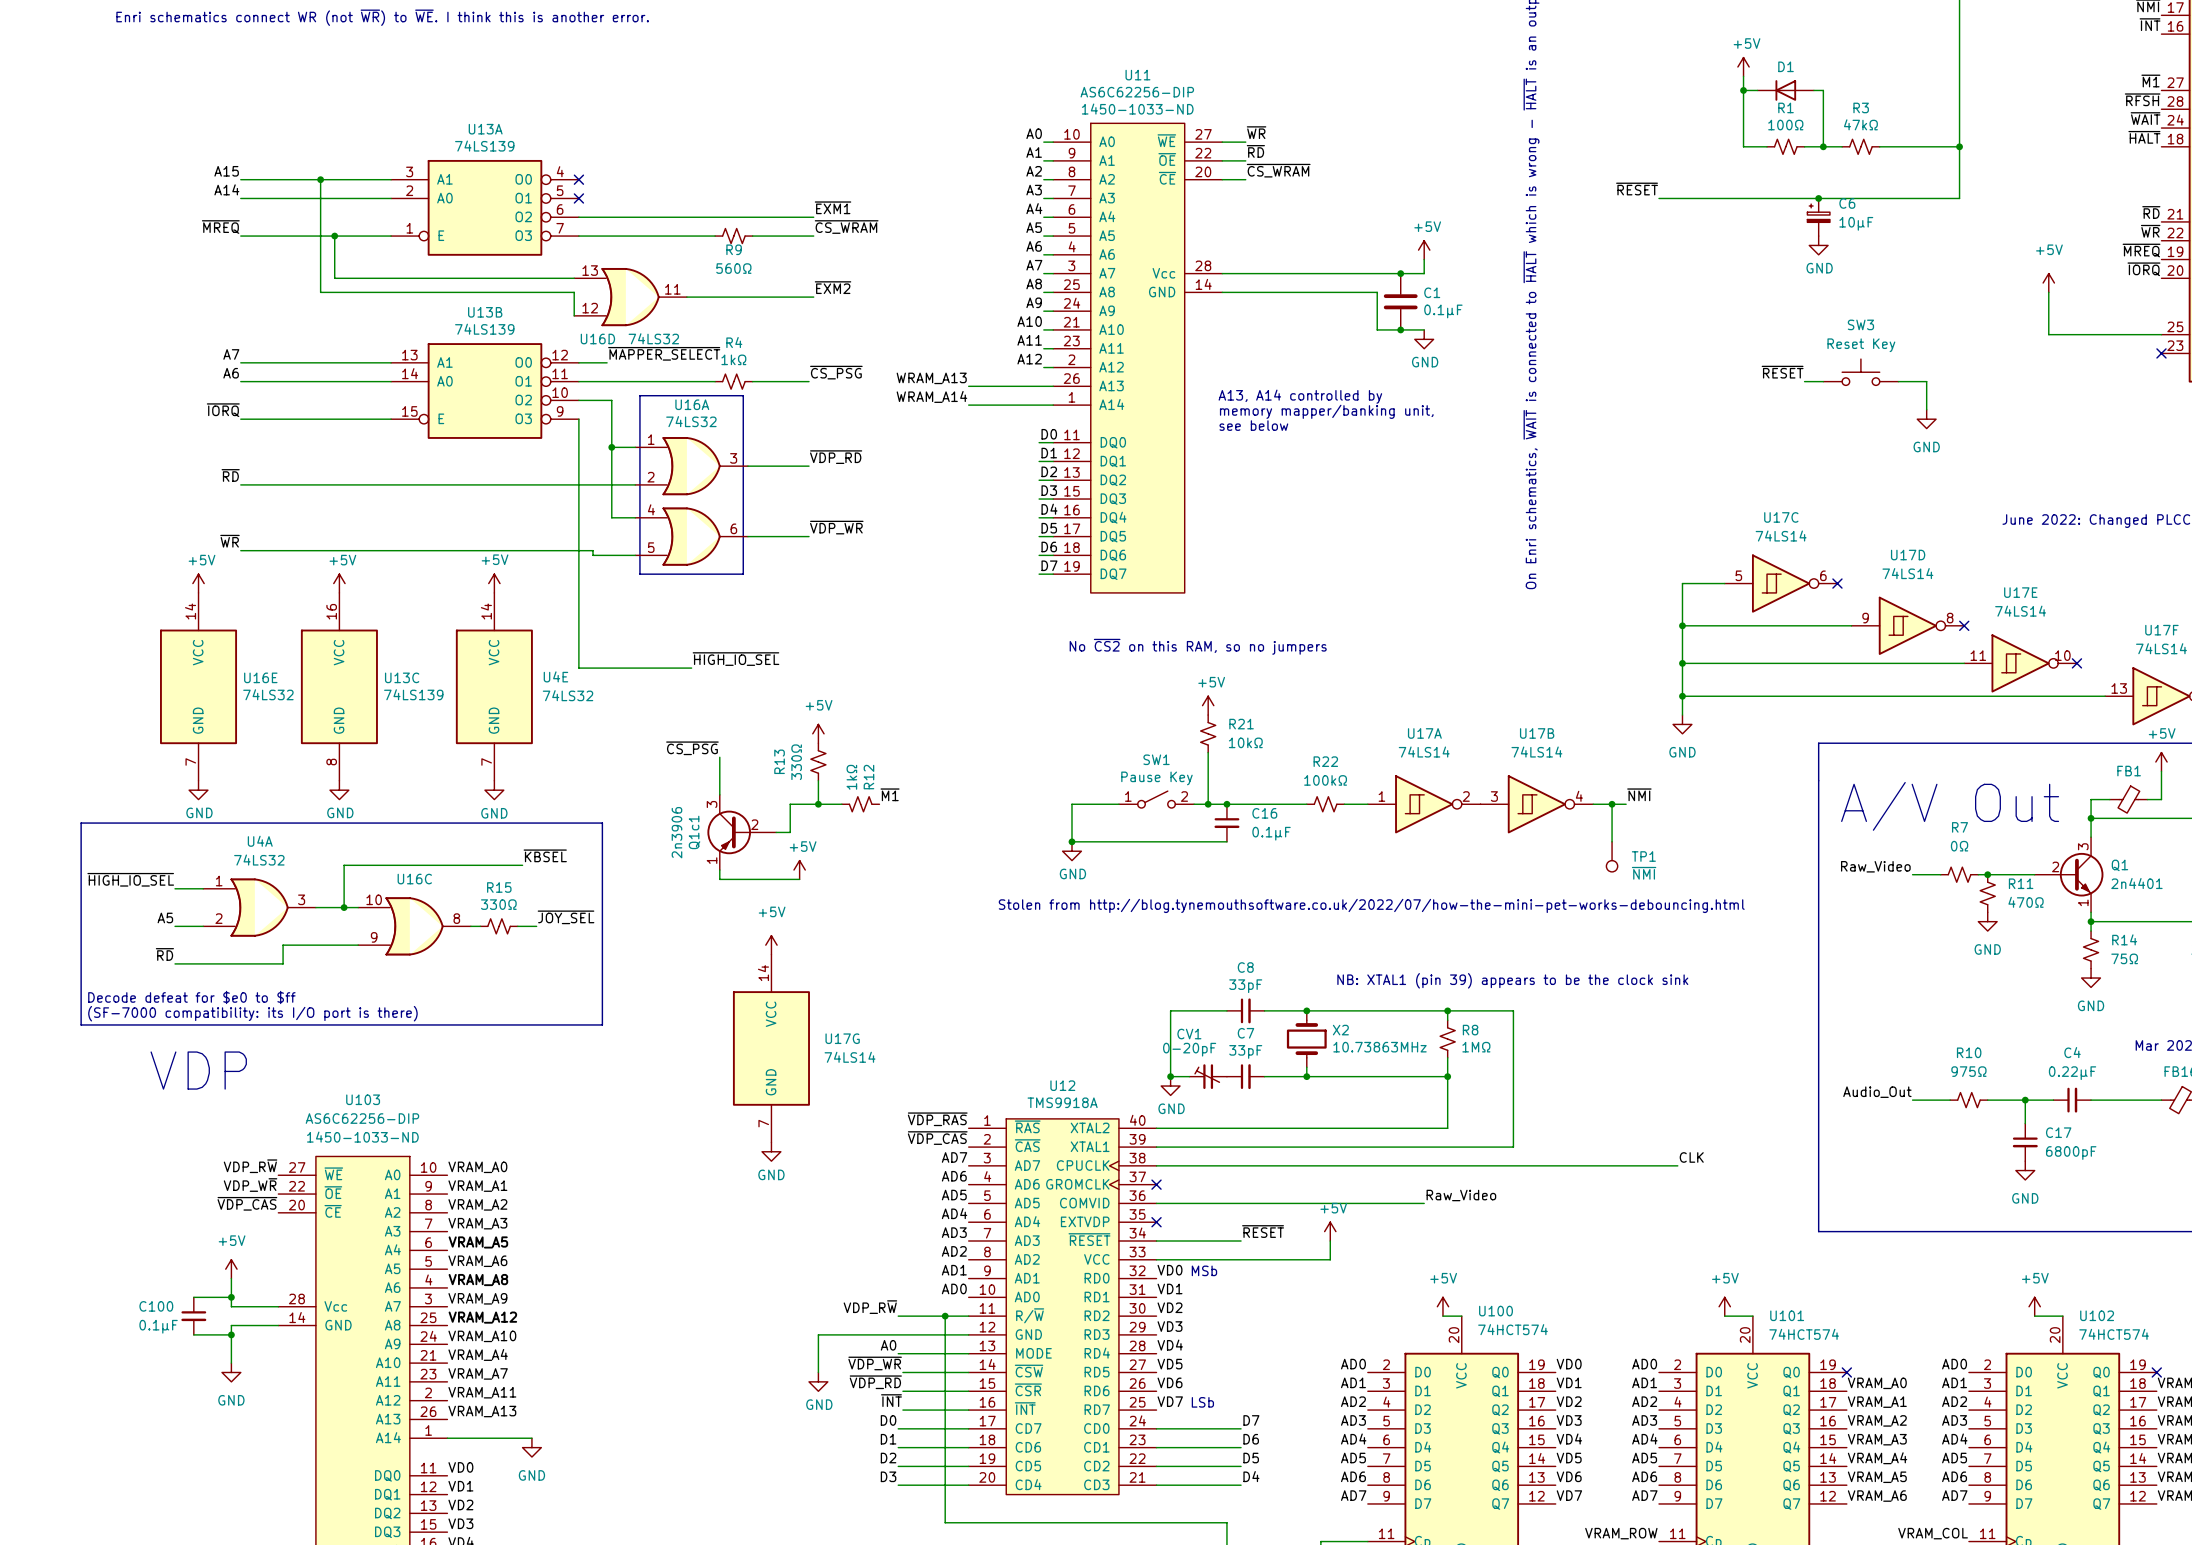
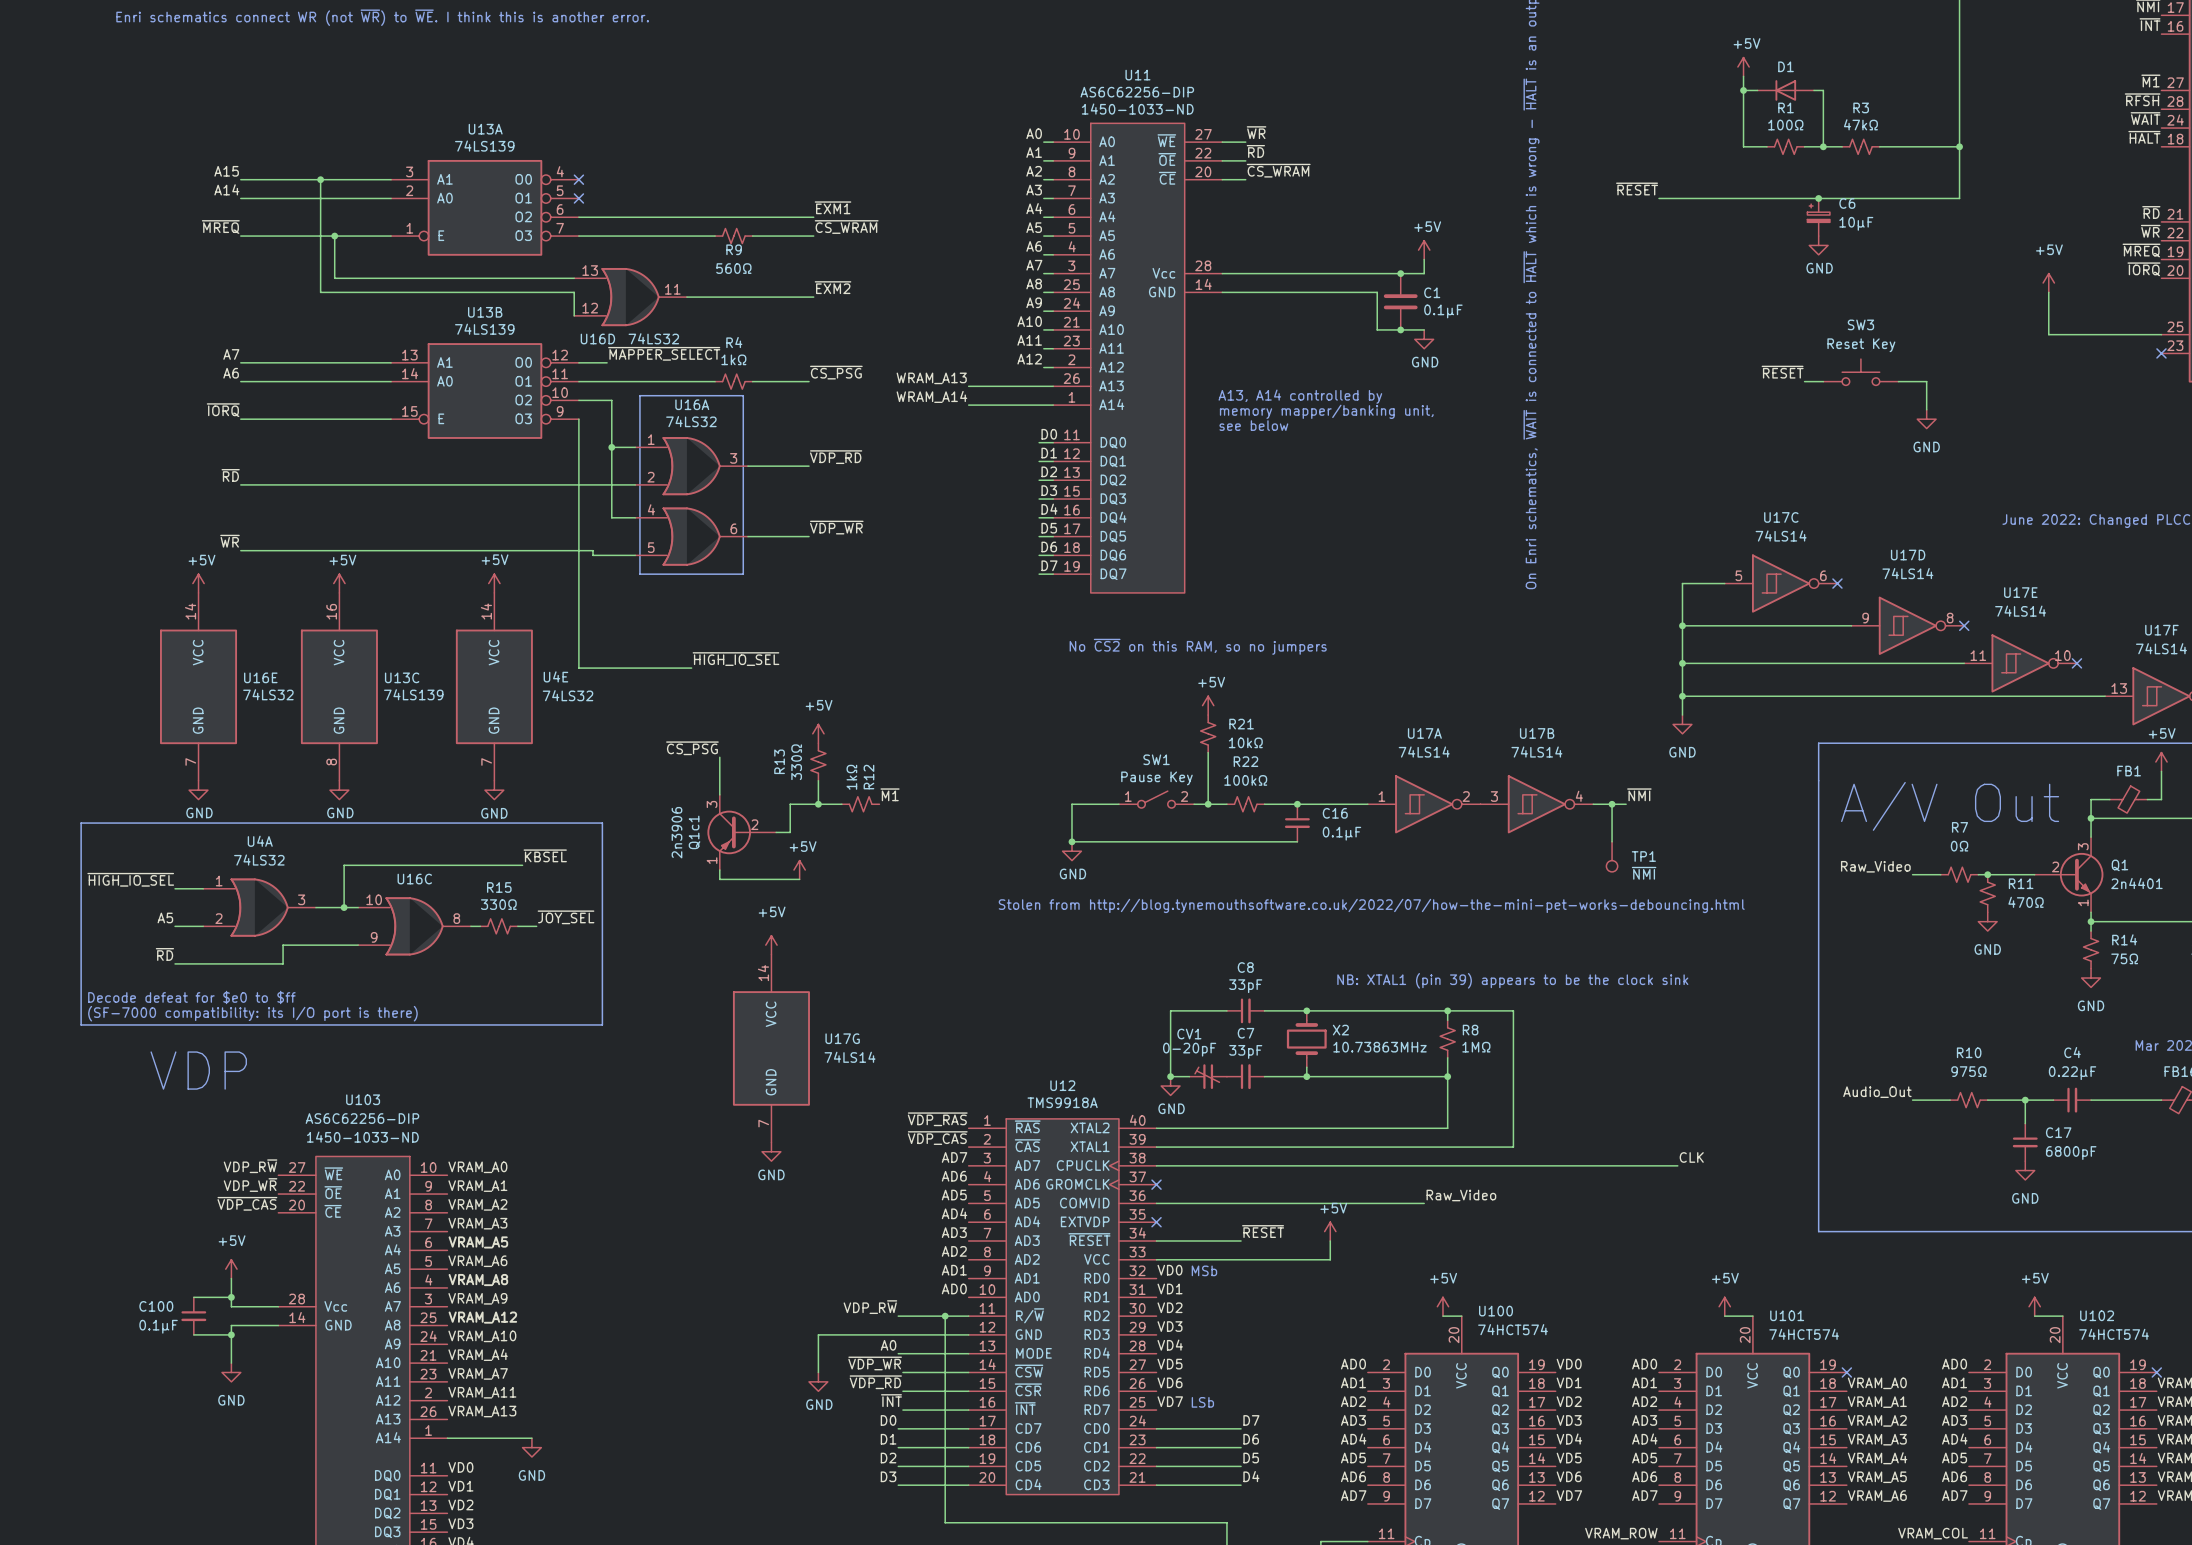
junction: (1226, 804) -> none
junction: none -> (1297, 804)
R22 position: (1325, 804) -> (1245, 804)
C16 position: (1226, 823) -> (1297, 823)
wire: none -> (1226, 841) (1297, 841)

